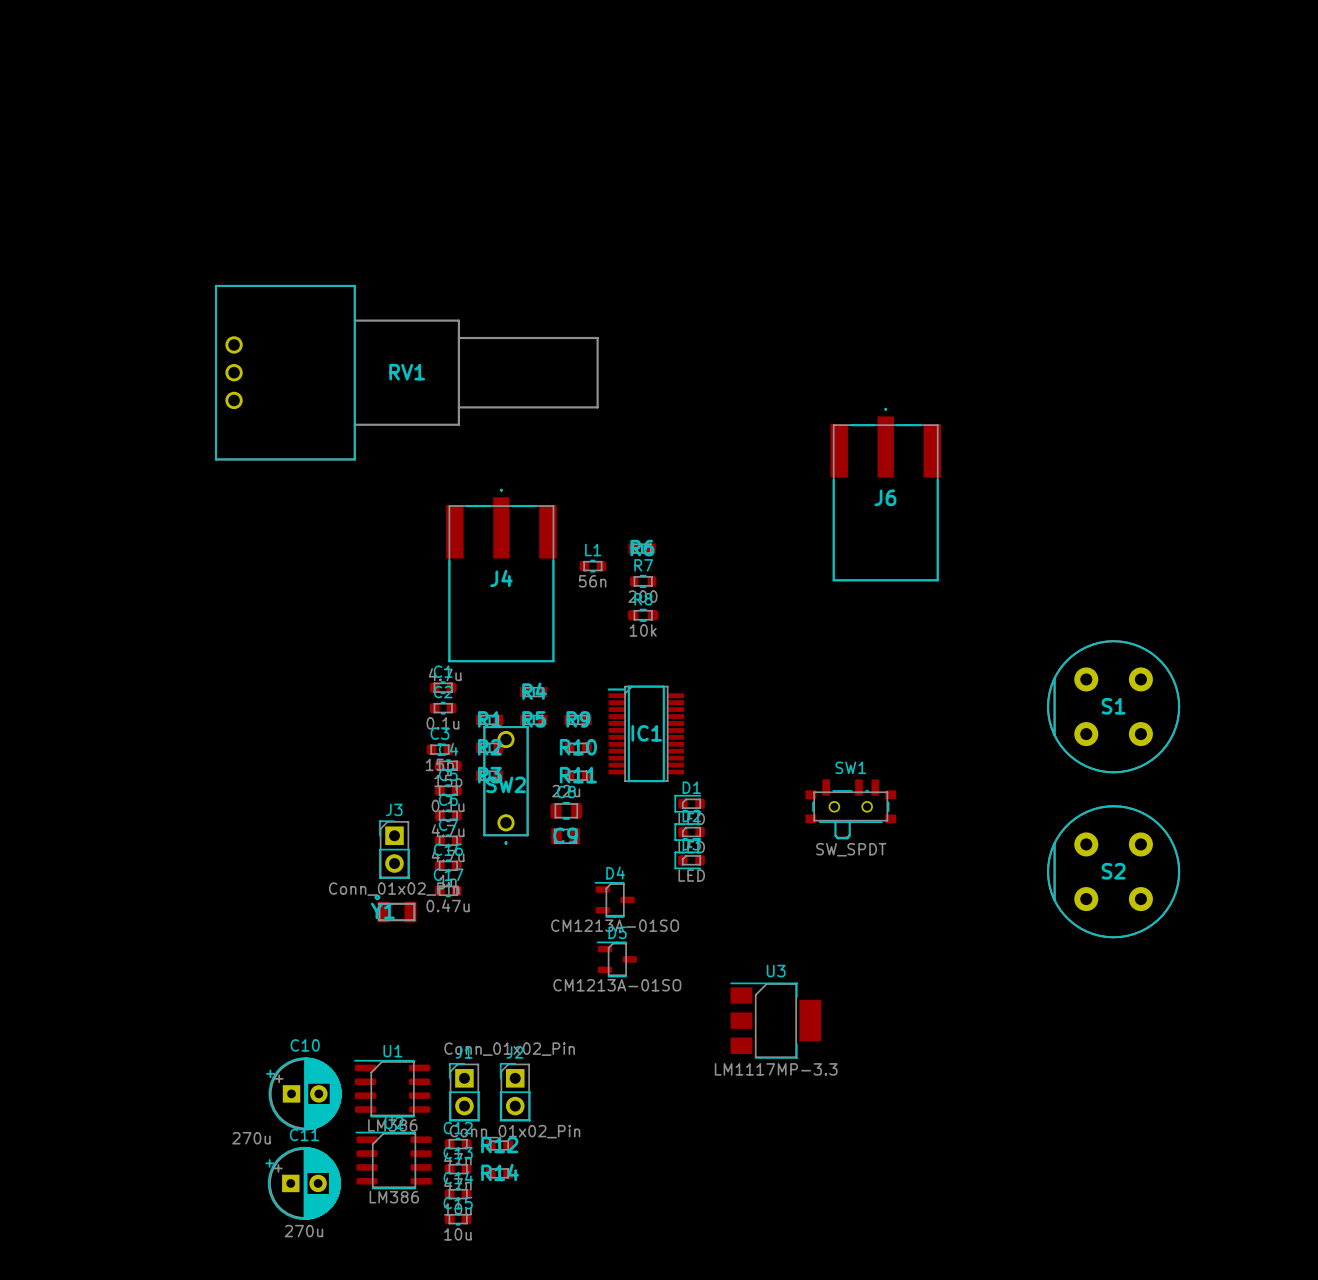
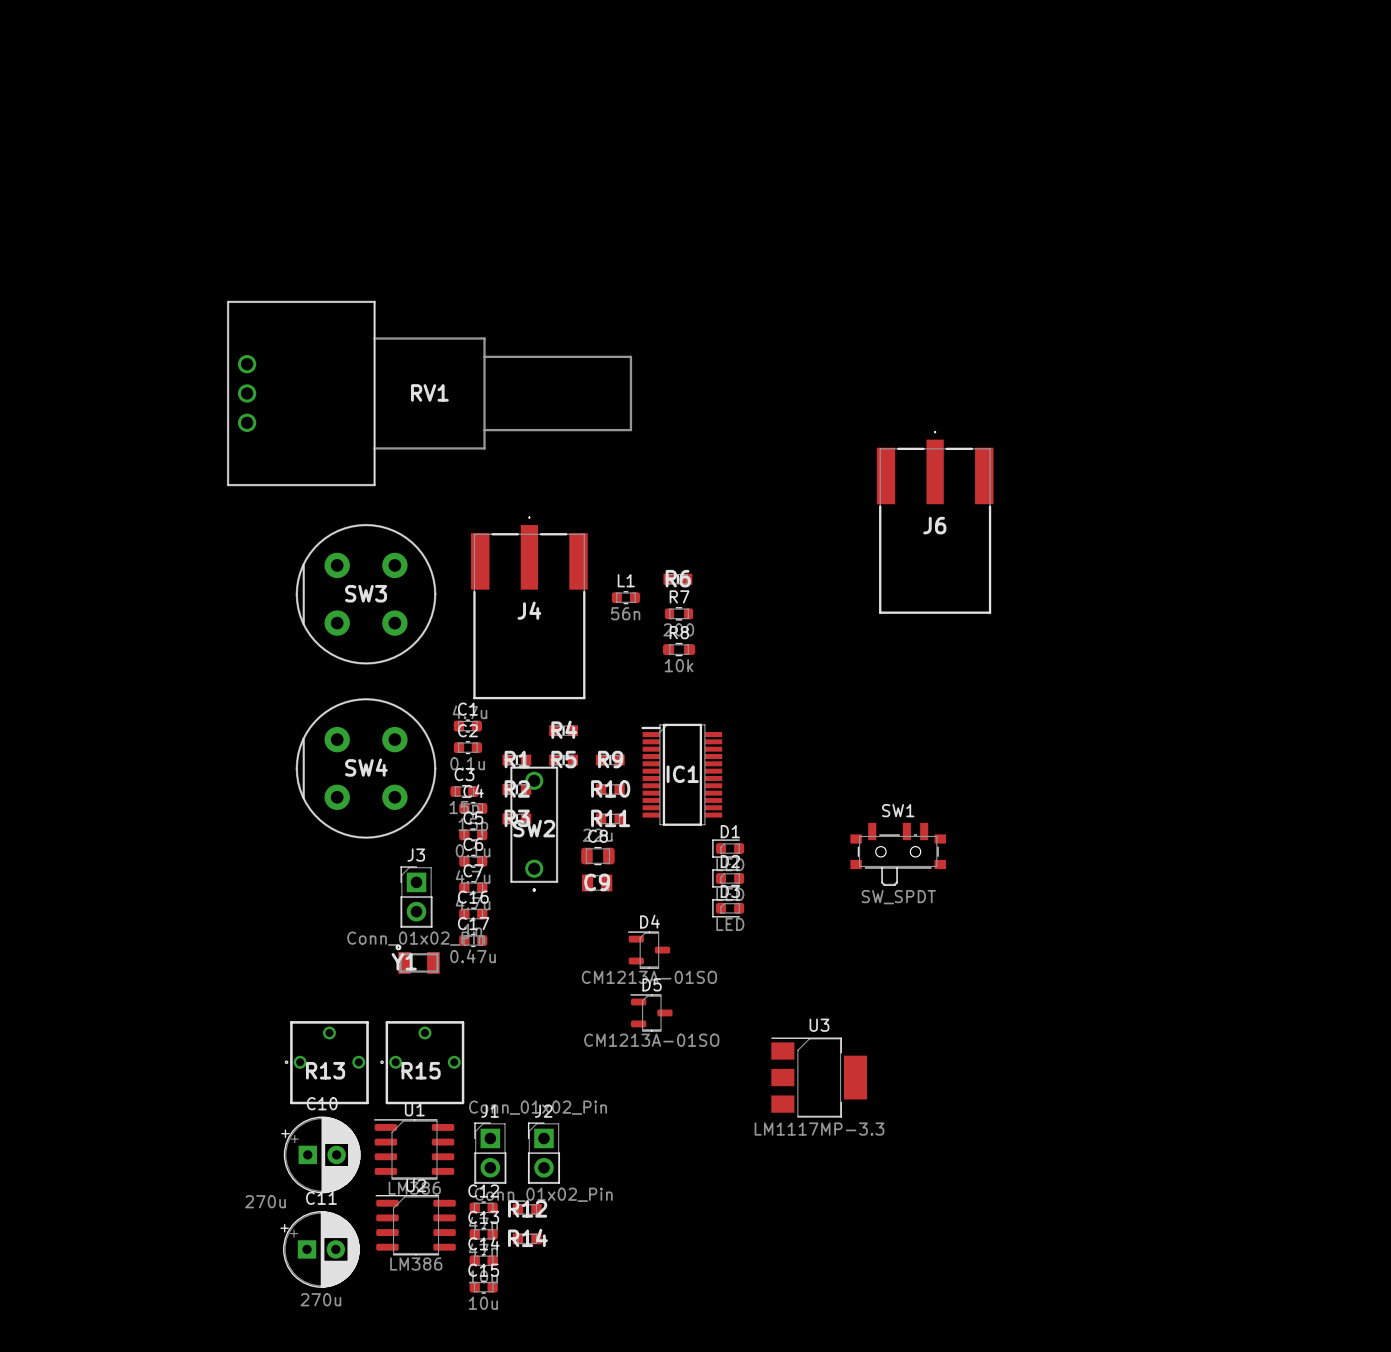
SW3: none -> (366, 594)
S1: (1113, 706) -> none
SW4: none -> (366, 768)
S2: (1113, 871) -> none
R13: none -> (326, 1062)
R15: none -> (422, 1062)

